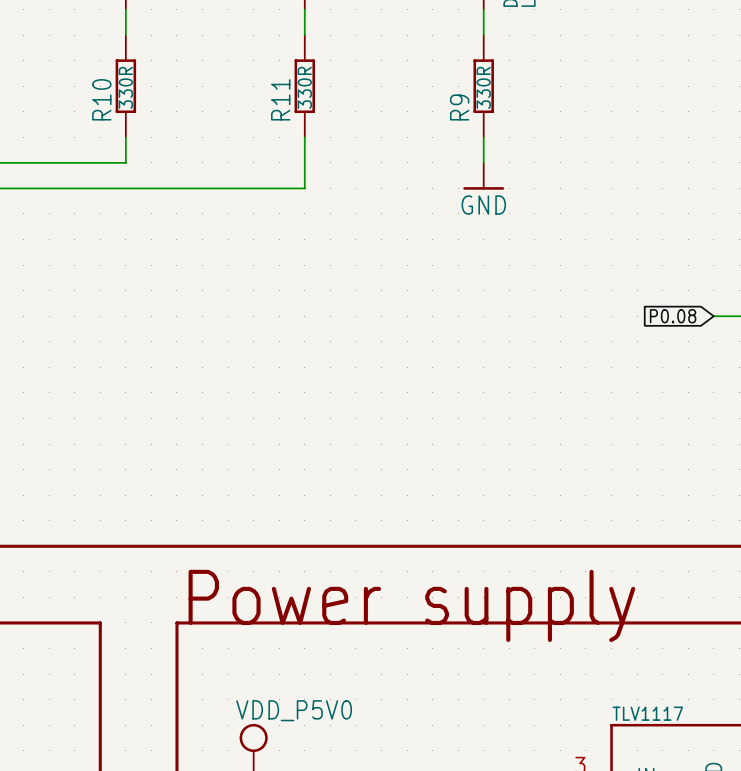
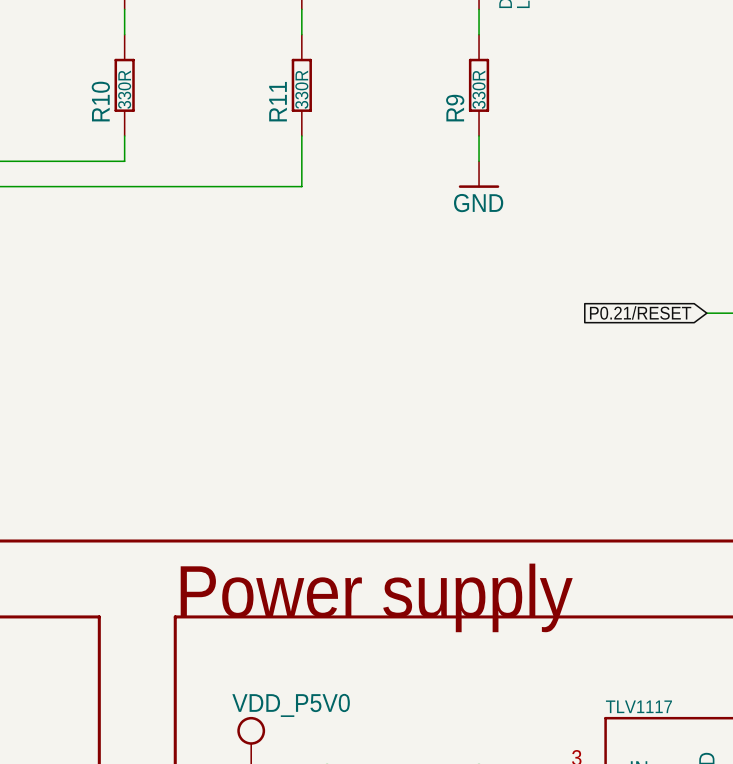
global label: P0.08 (673, 316) -> P0.21/RESET (640, 312)

